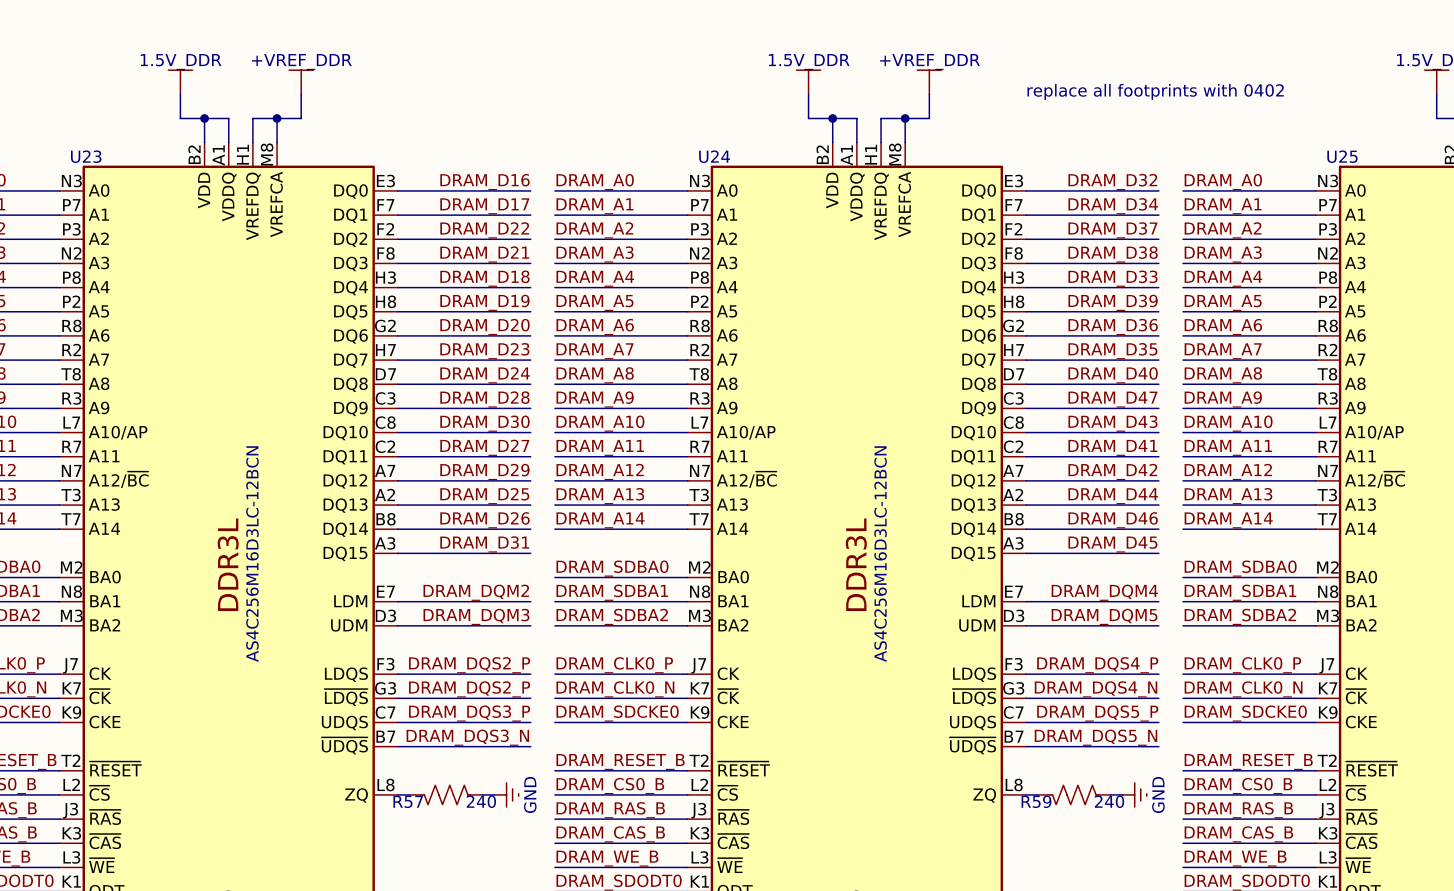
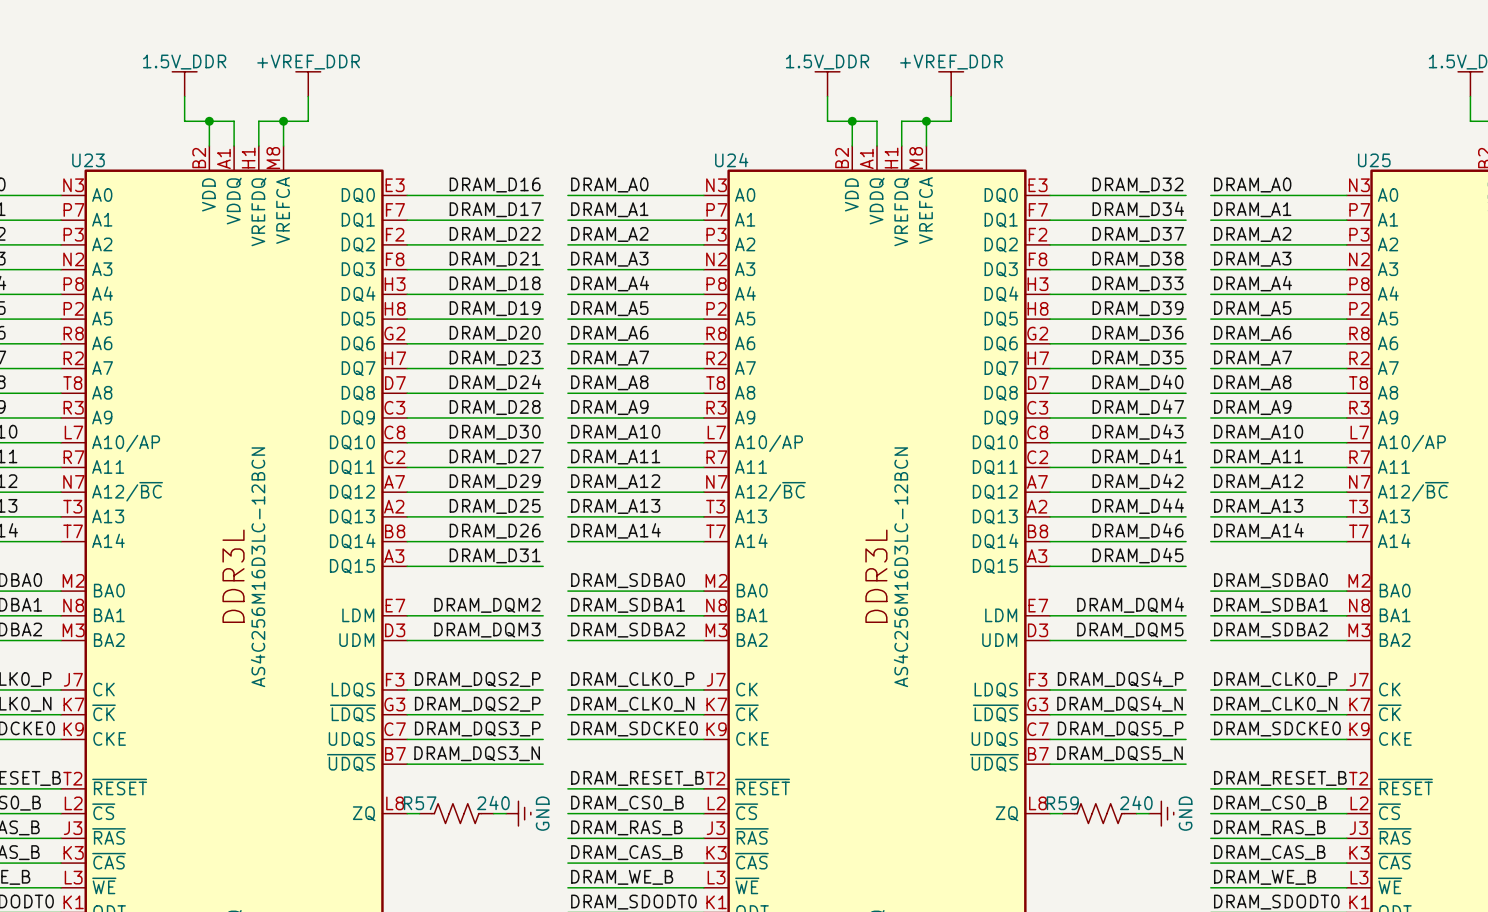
text: replace all footprints with 0402 (1155, 91) -> none
R57 flip: as is (446, 794) -> left-right (456, 813)
R59 flip: as is (1074, 794) -> left-right (1099, 813)

